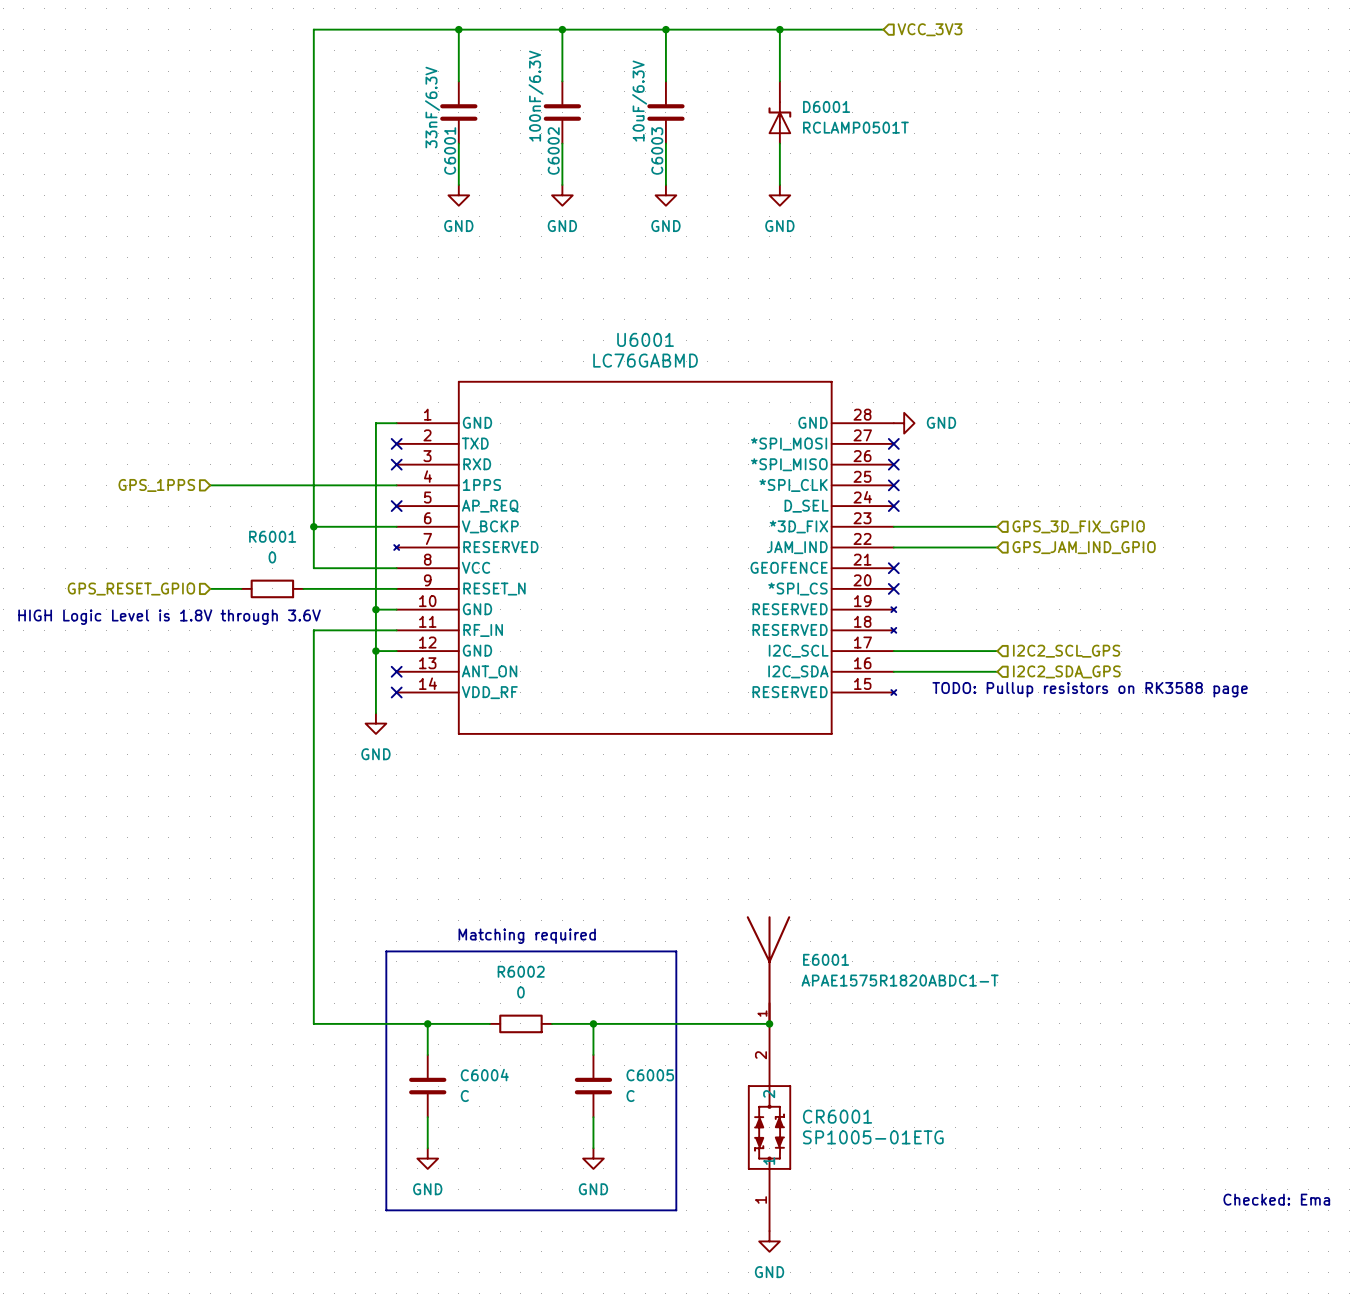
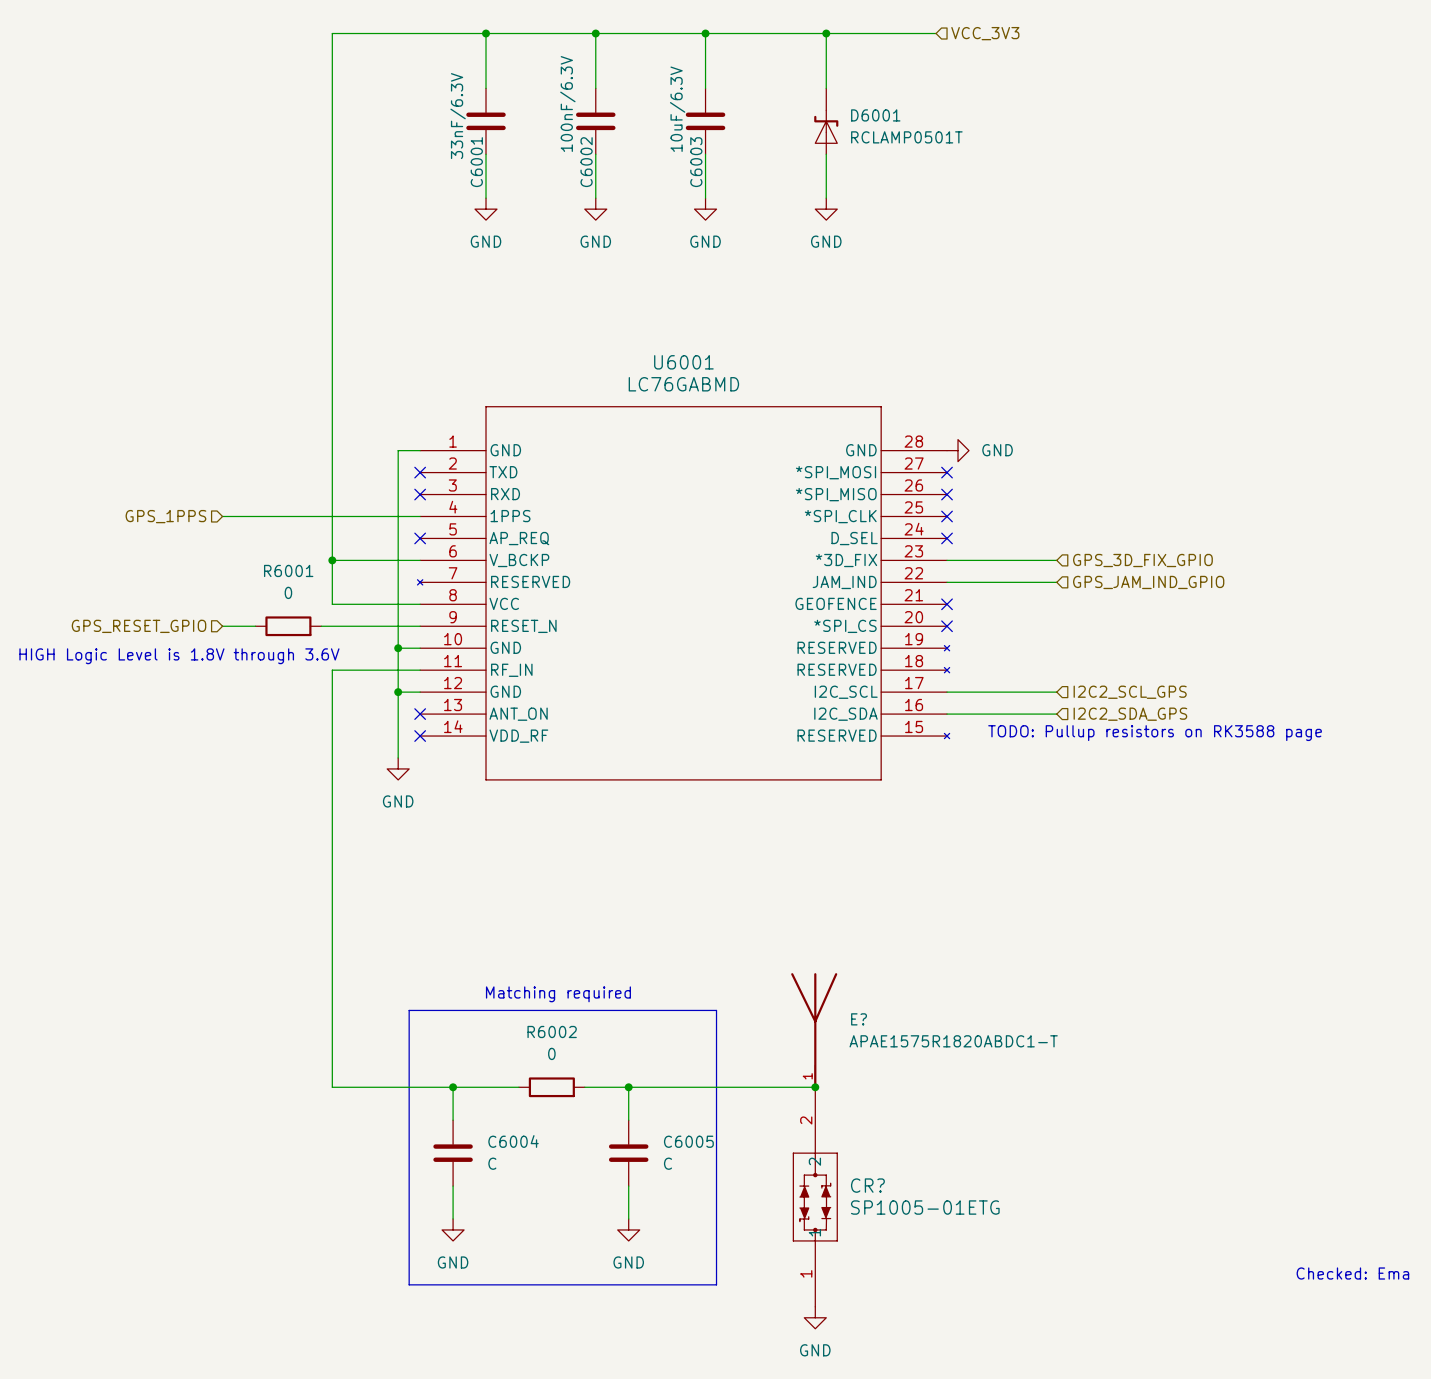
E6001 name: E6001 (826, 959) -> E? (859, 1019)
CR6001 name: CR6001 (837, 1116) -> CR? (867, 1185)

